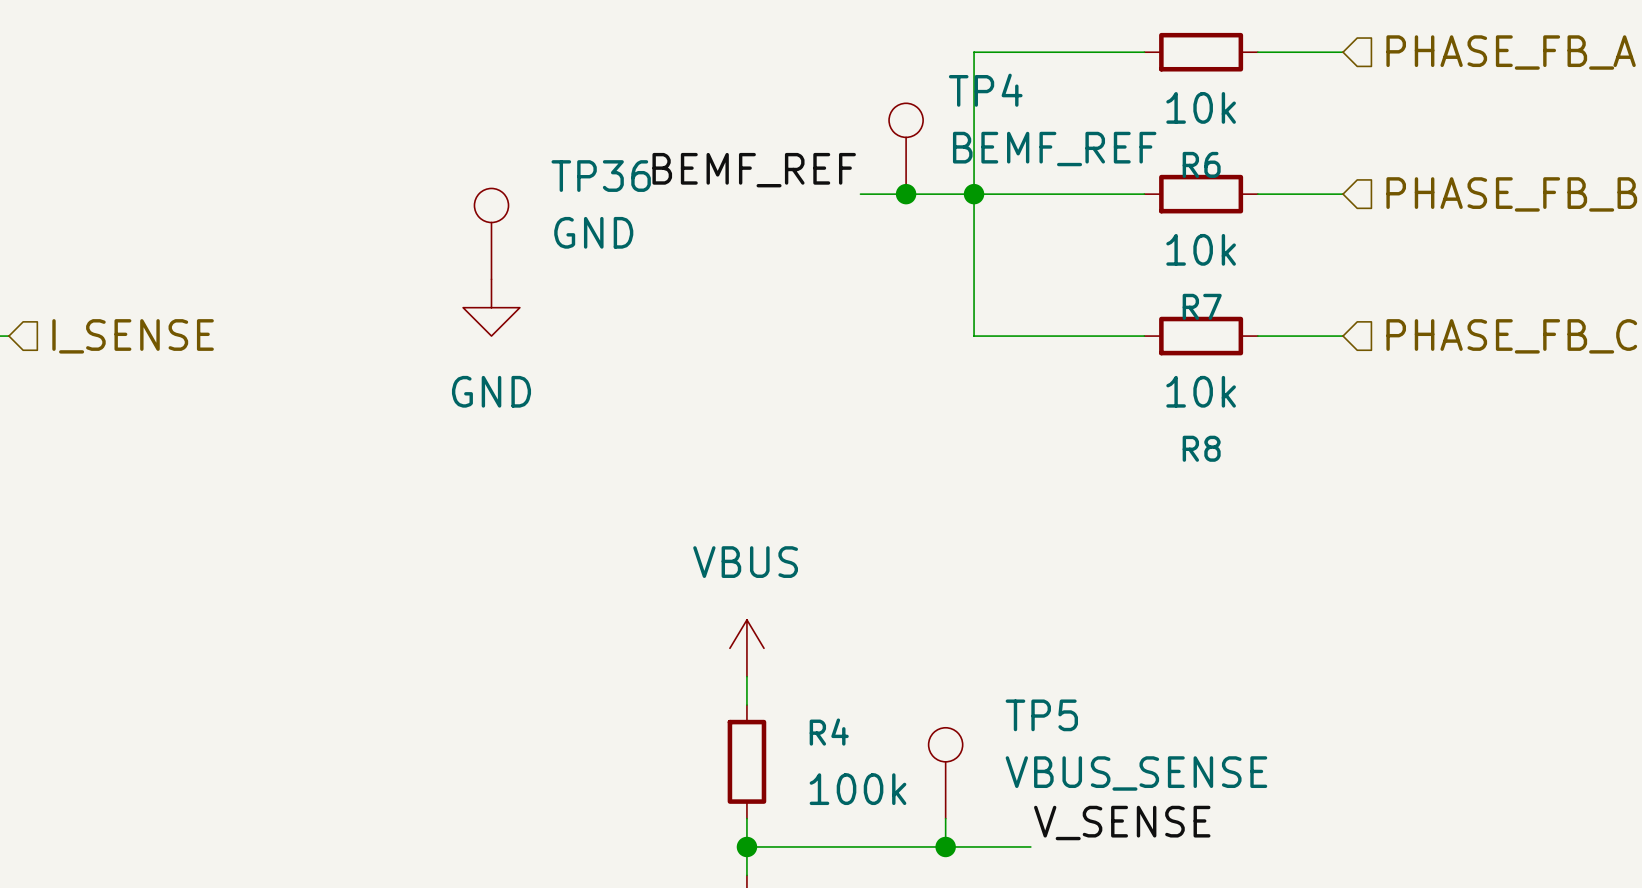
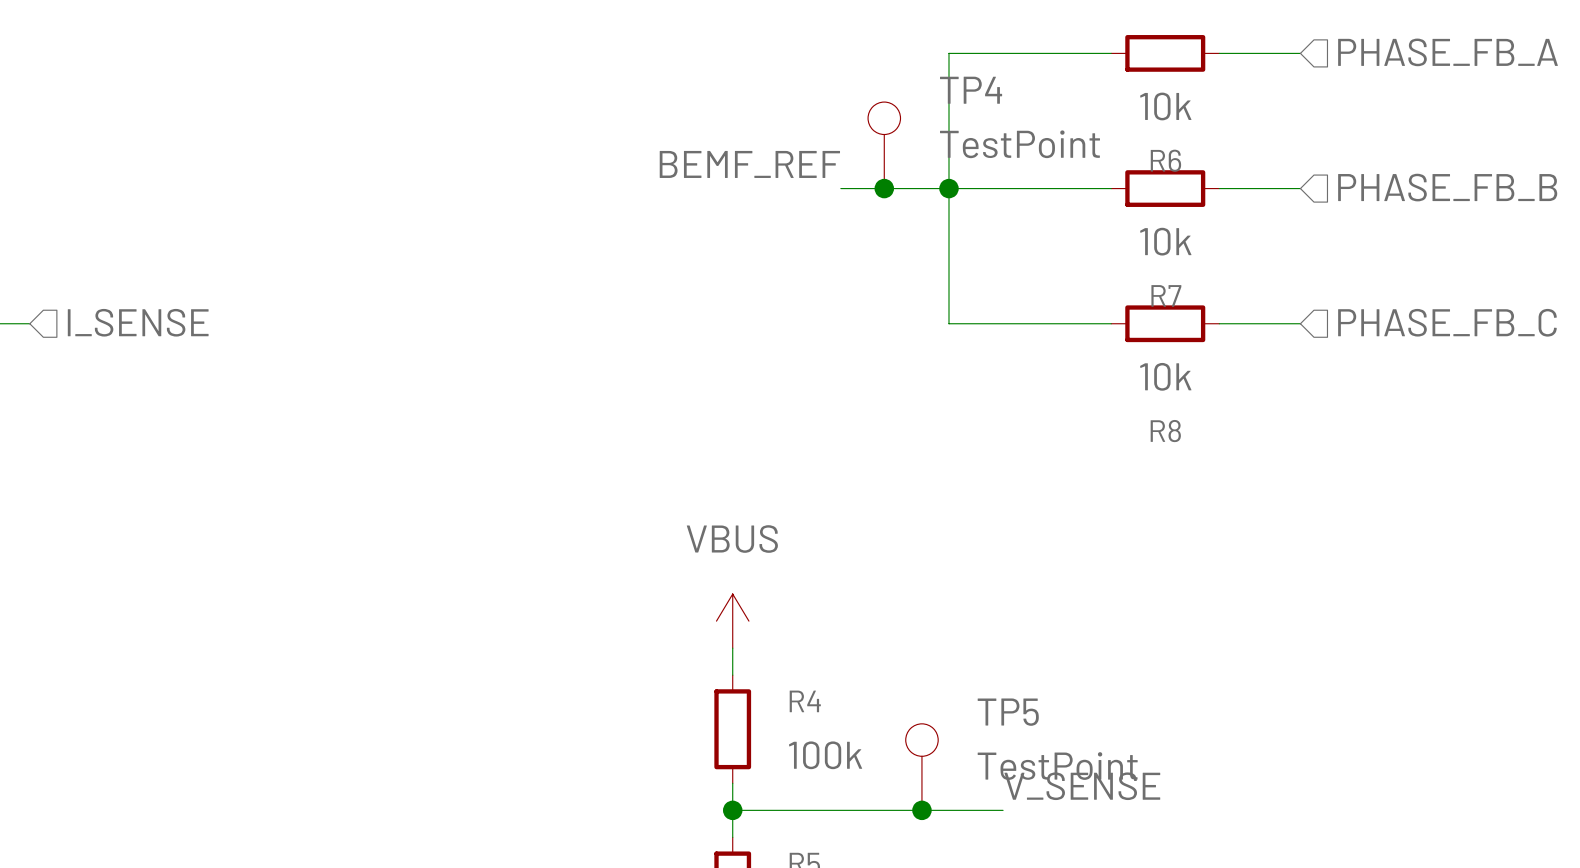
TP4 name position: TP4 (985, 90) -> TP4 (971, 90)
TP4 value: BEMF_REF (1054, 149) -> TestPoint (1019, 144)
TP36: GND (491, 233) -> none
power symbol: GND (491, 307) -> none
TP5 position: (945, 773) -> (921, 767)
TP5 value: VBUS_SENSE (1136, 773) -> TestPoint (1057, 766)

